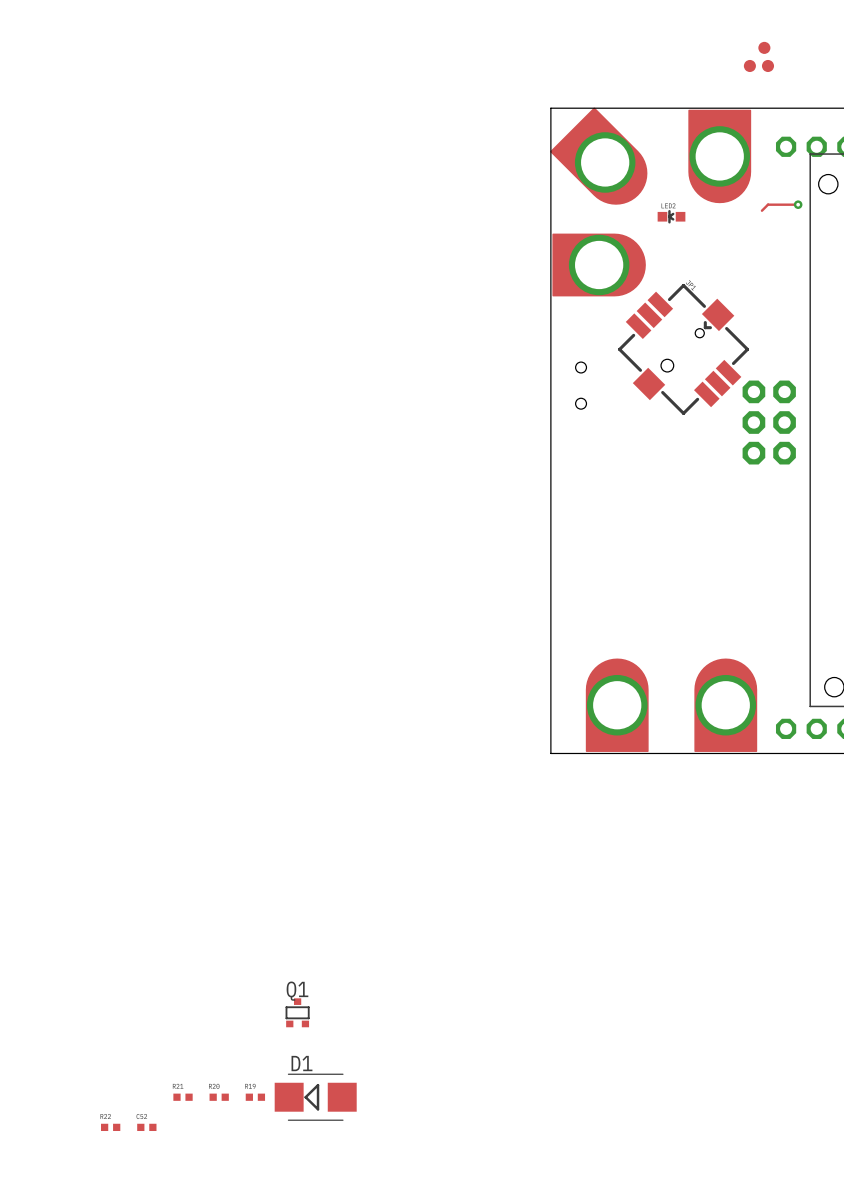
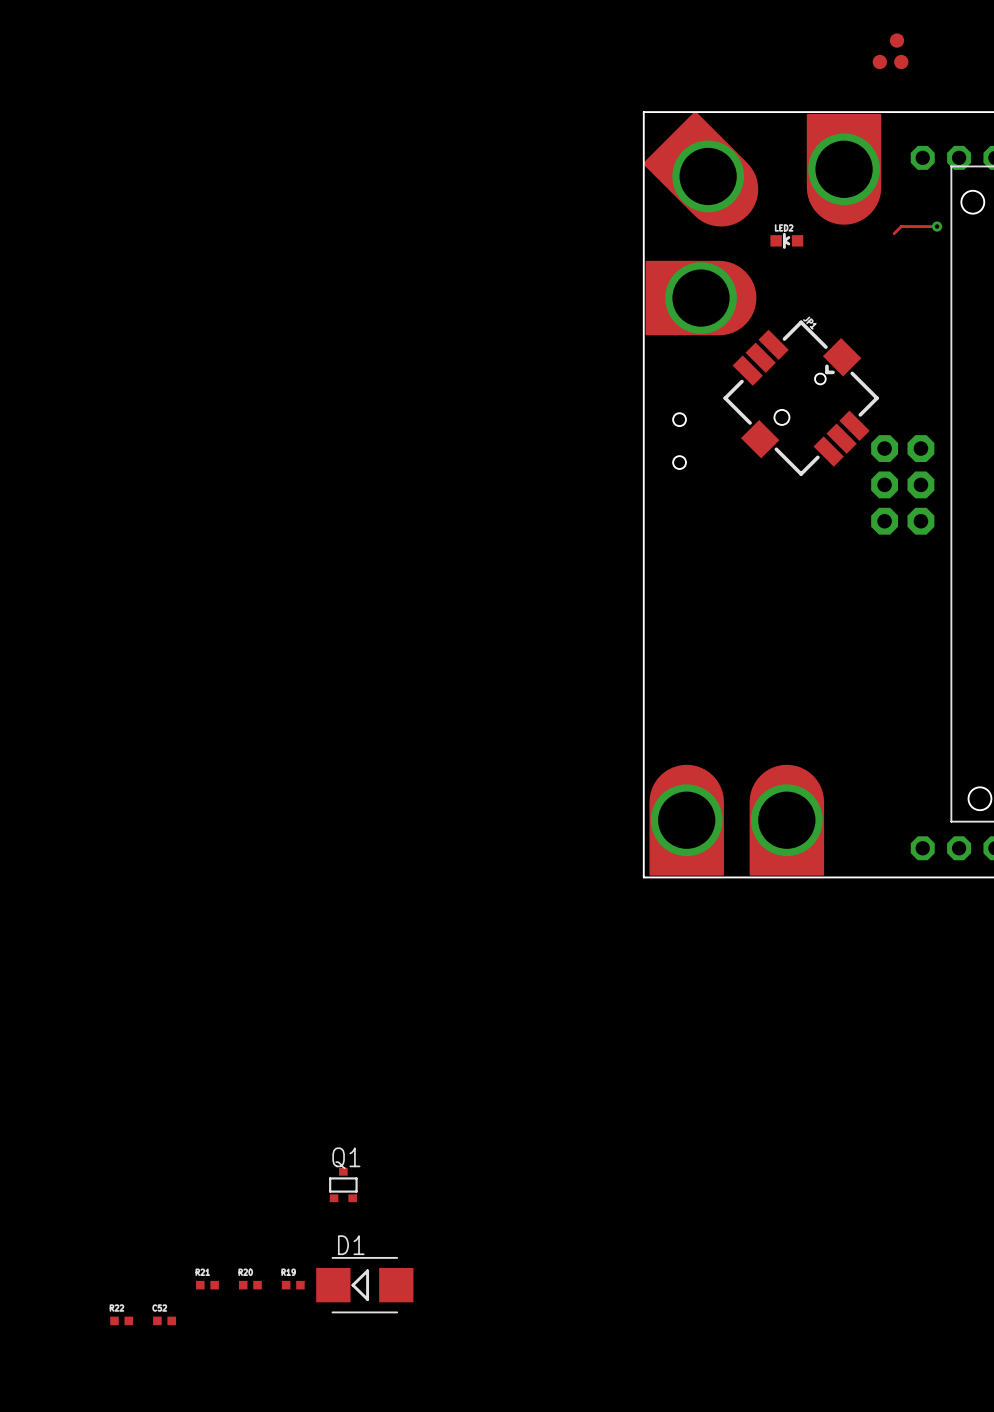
part: none -> (686, 820)
part: (617, 705) -> none
part: none -> (786, 820)
part: (725, 705) -> none

